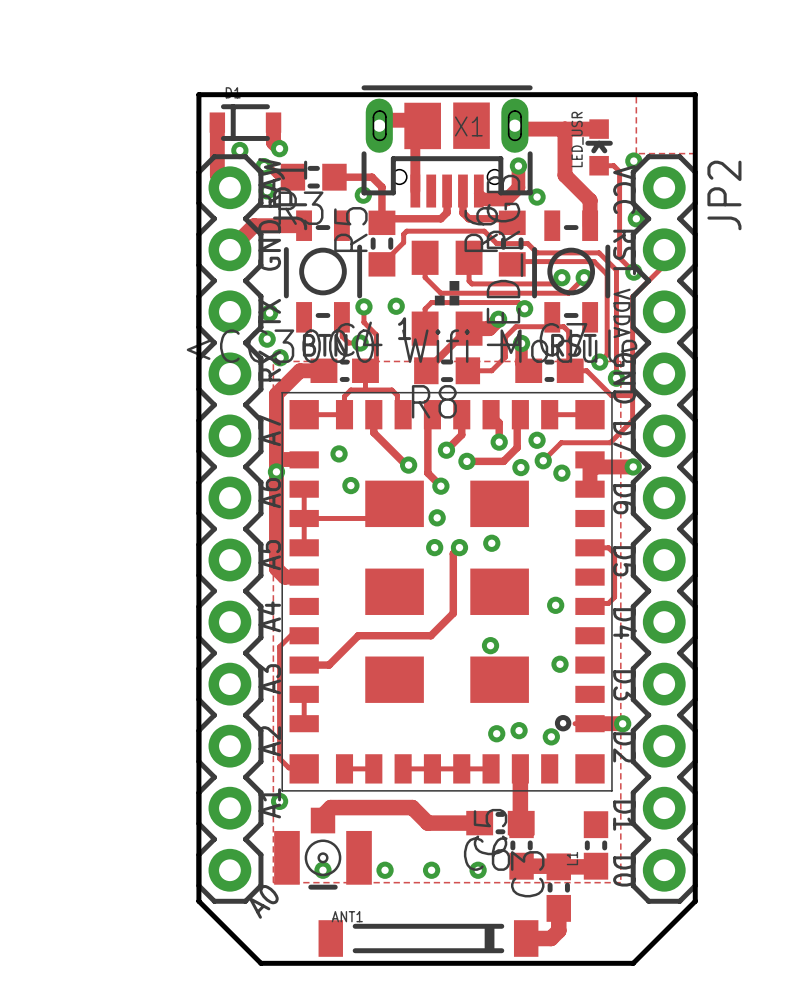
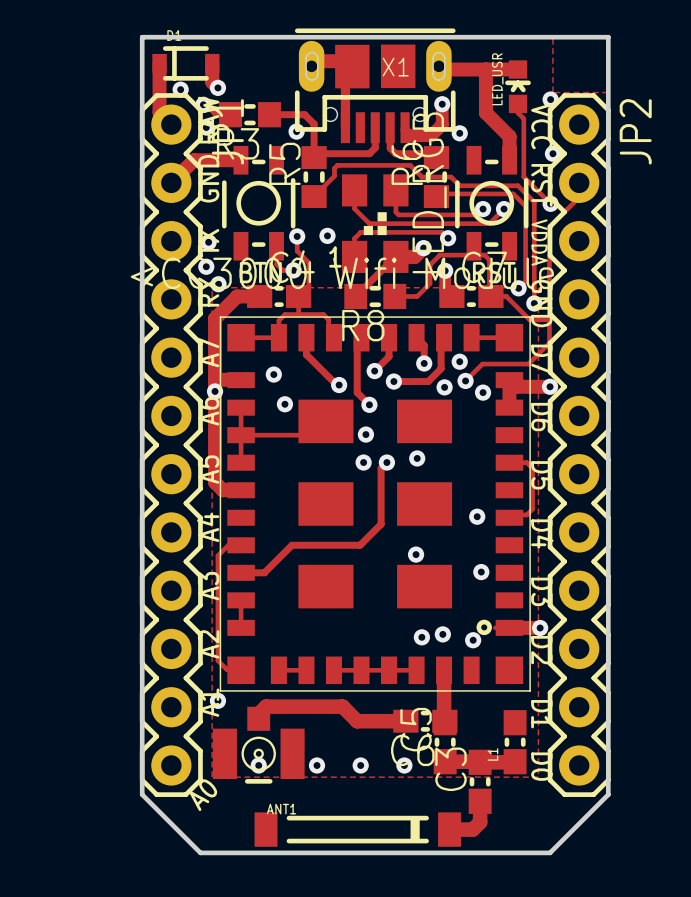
track: (599, 165) (613, 165) (619, 171) (619, 257) -> (518, 103) (518, 112) (523, 118) (523, 177) (537, 190)

